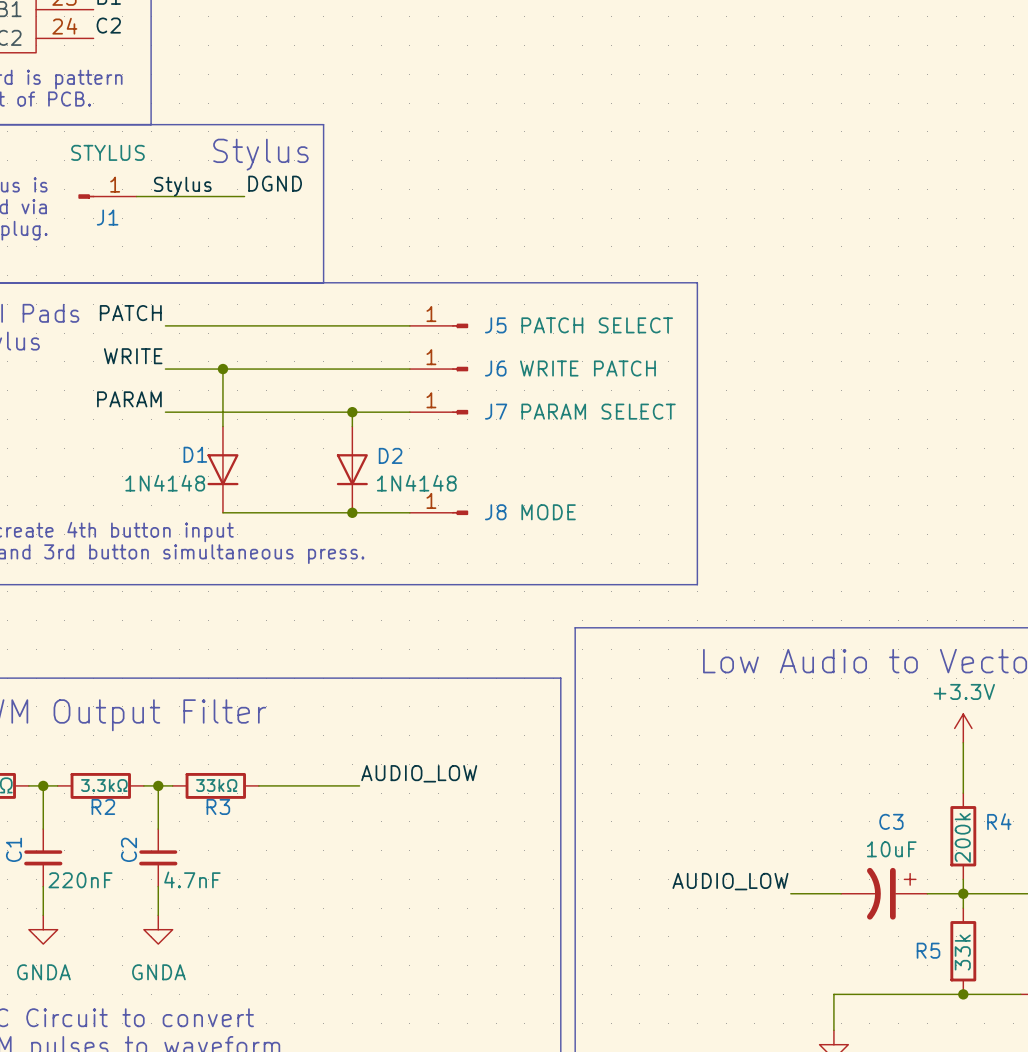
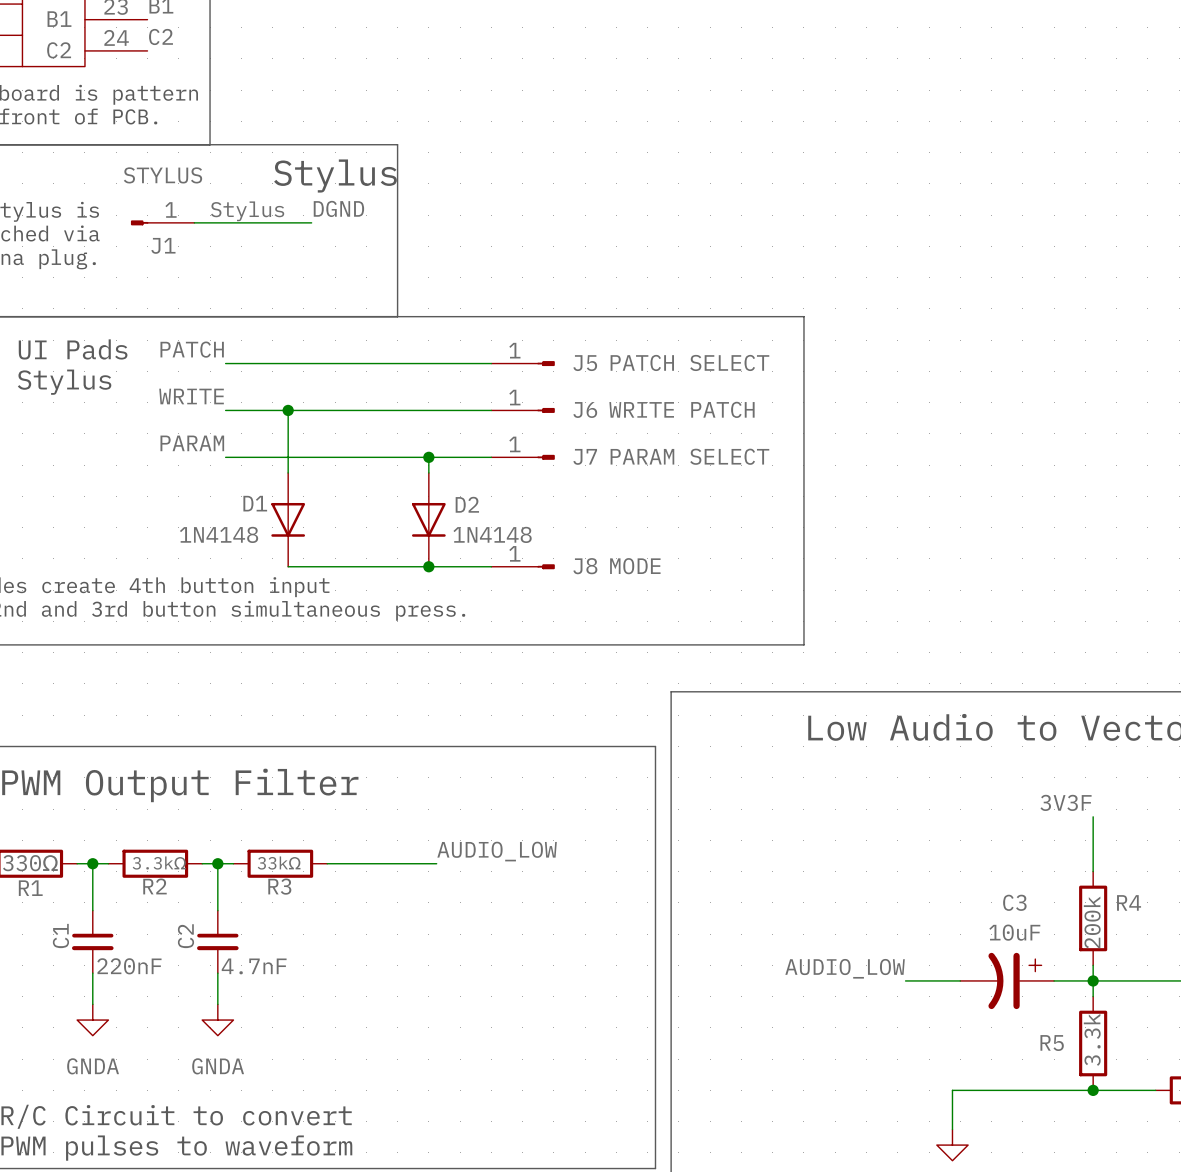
power symbol: +3.3V (963, 728) -> none
label: none -> 3V3F (1066, 802)
R5 value: 33k (962, 952) -> 3.3k (1092, 1039)

